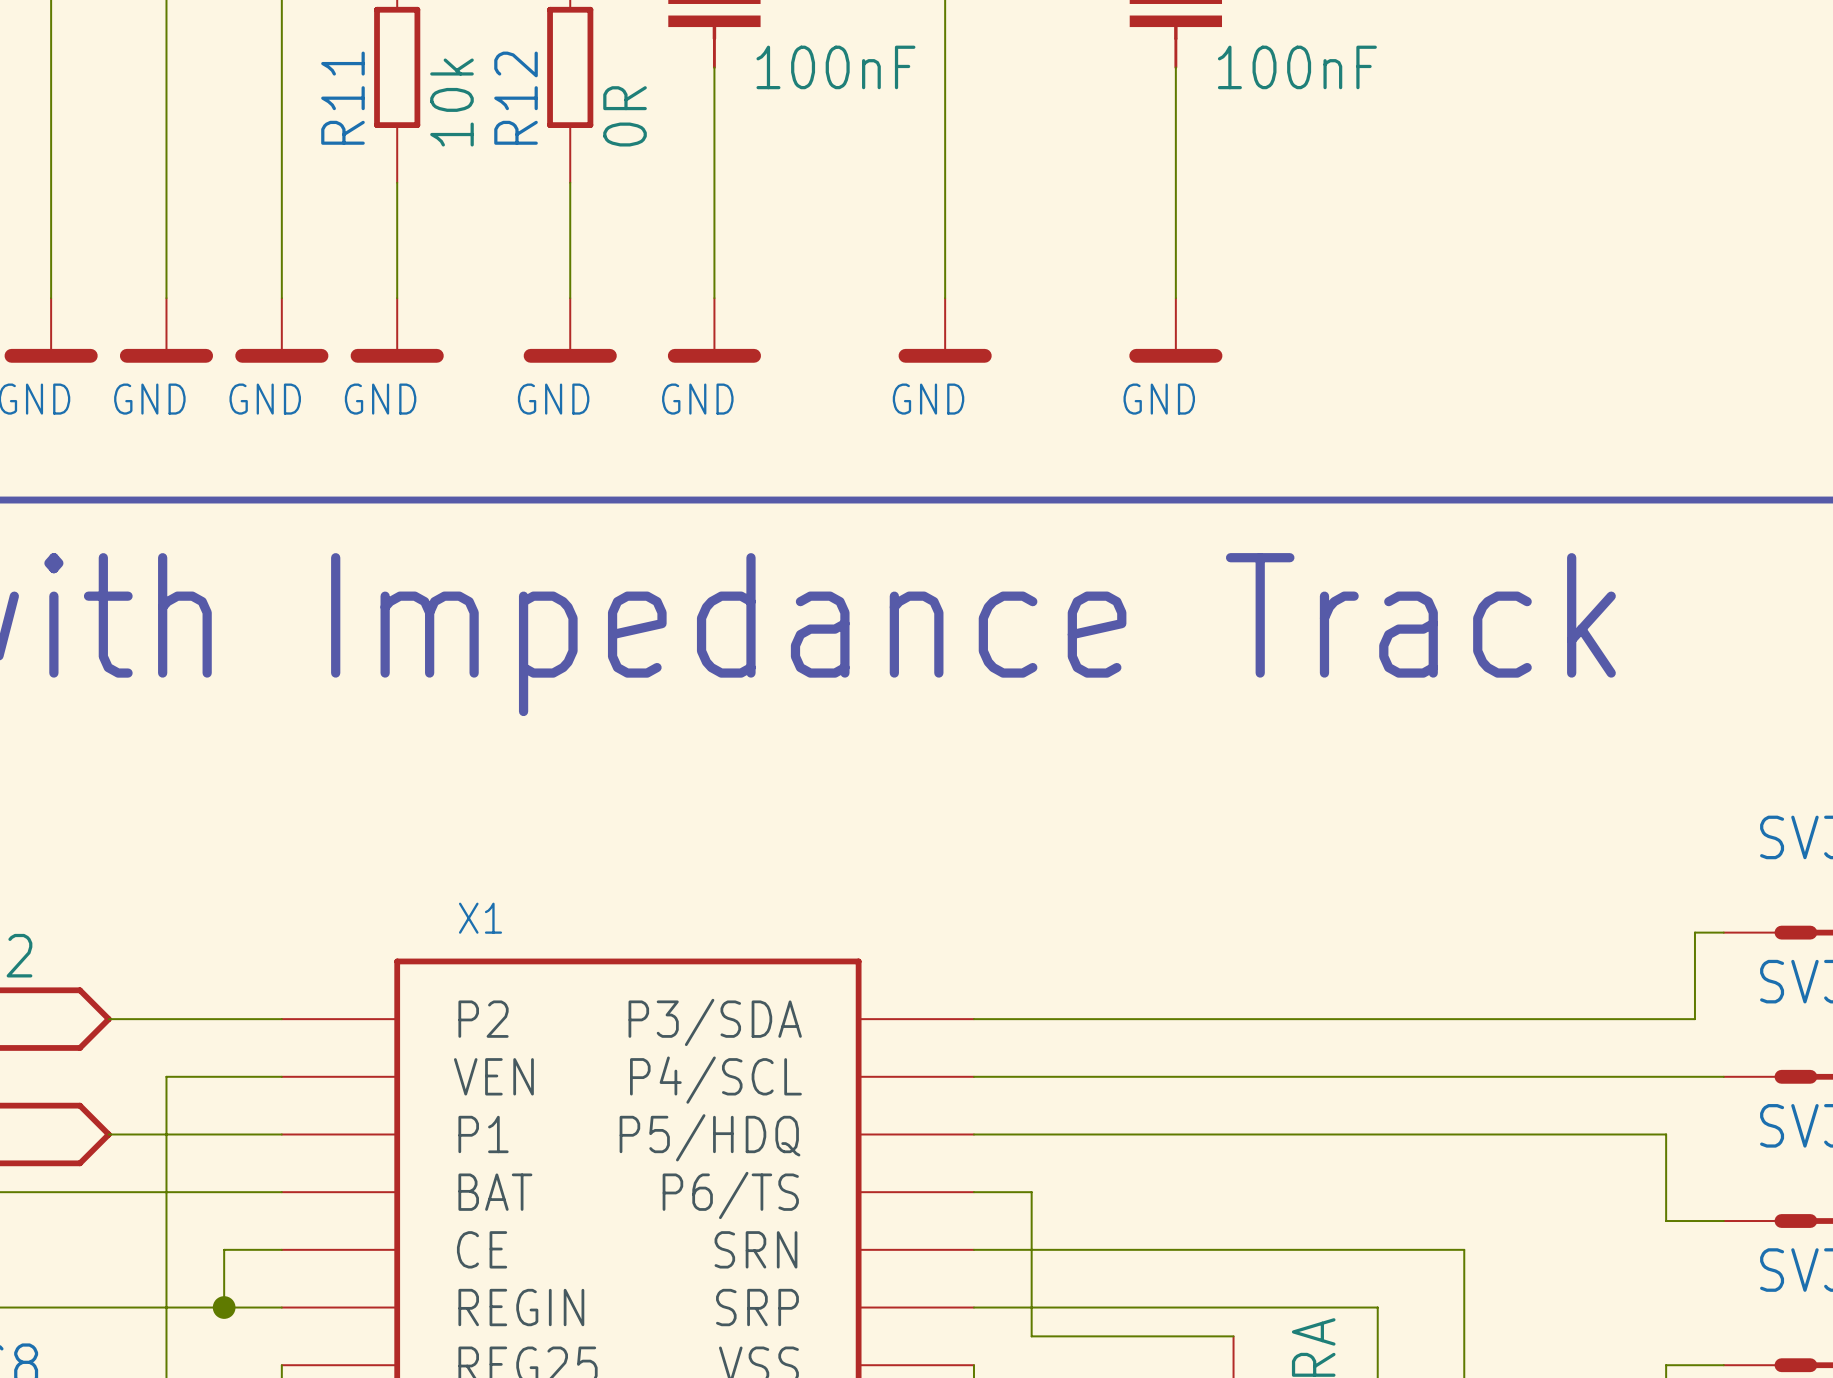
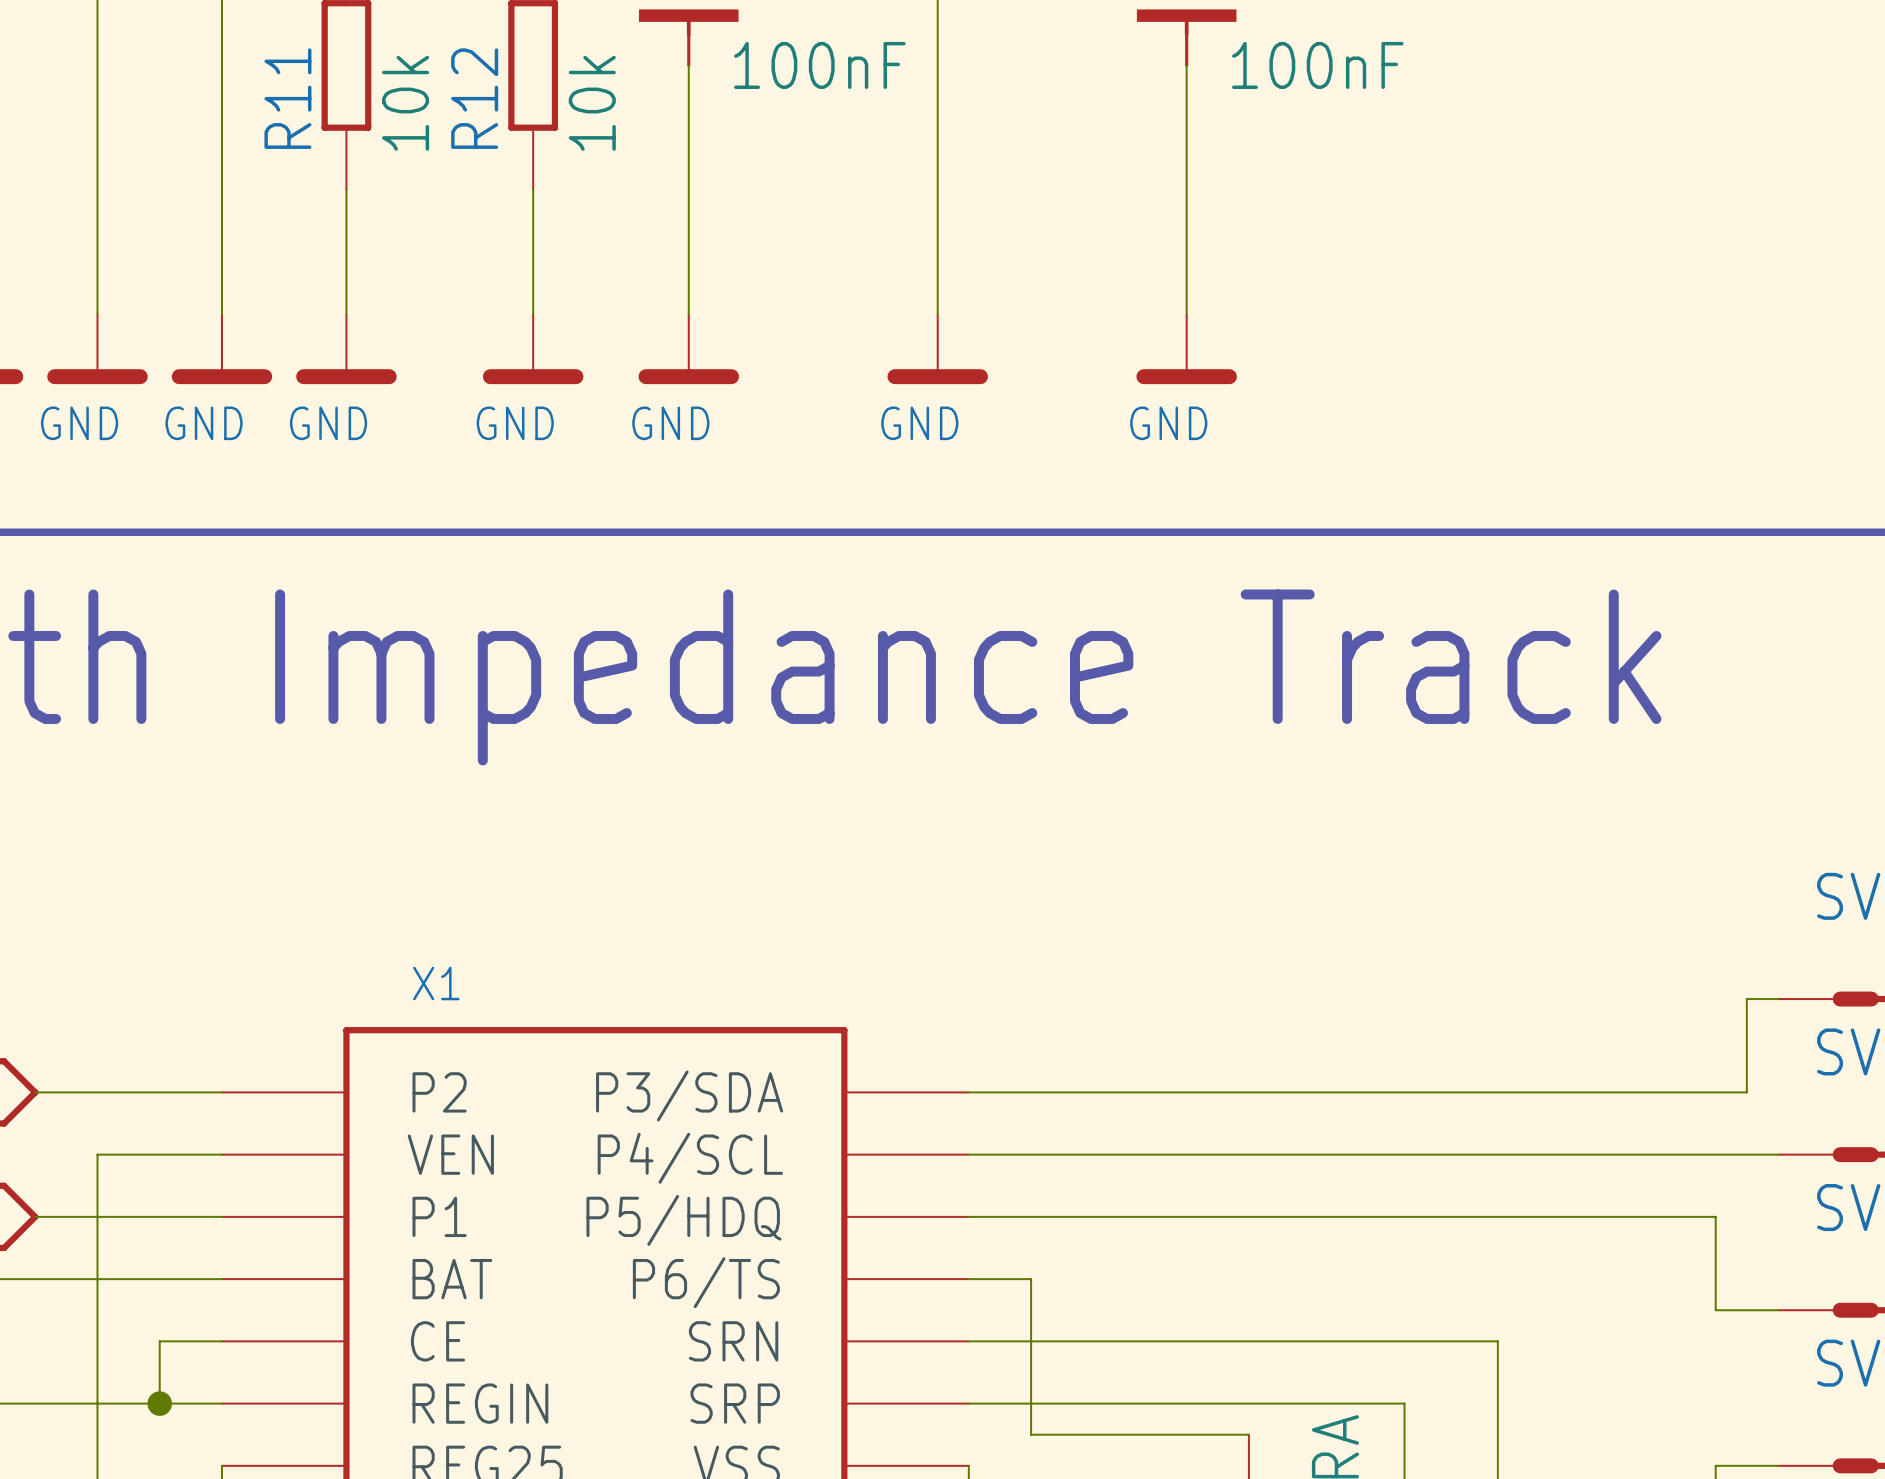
R12 value: 0R (625, 116) -> 10k (592, 103)

